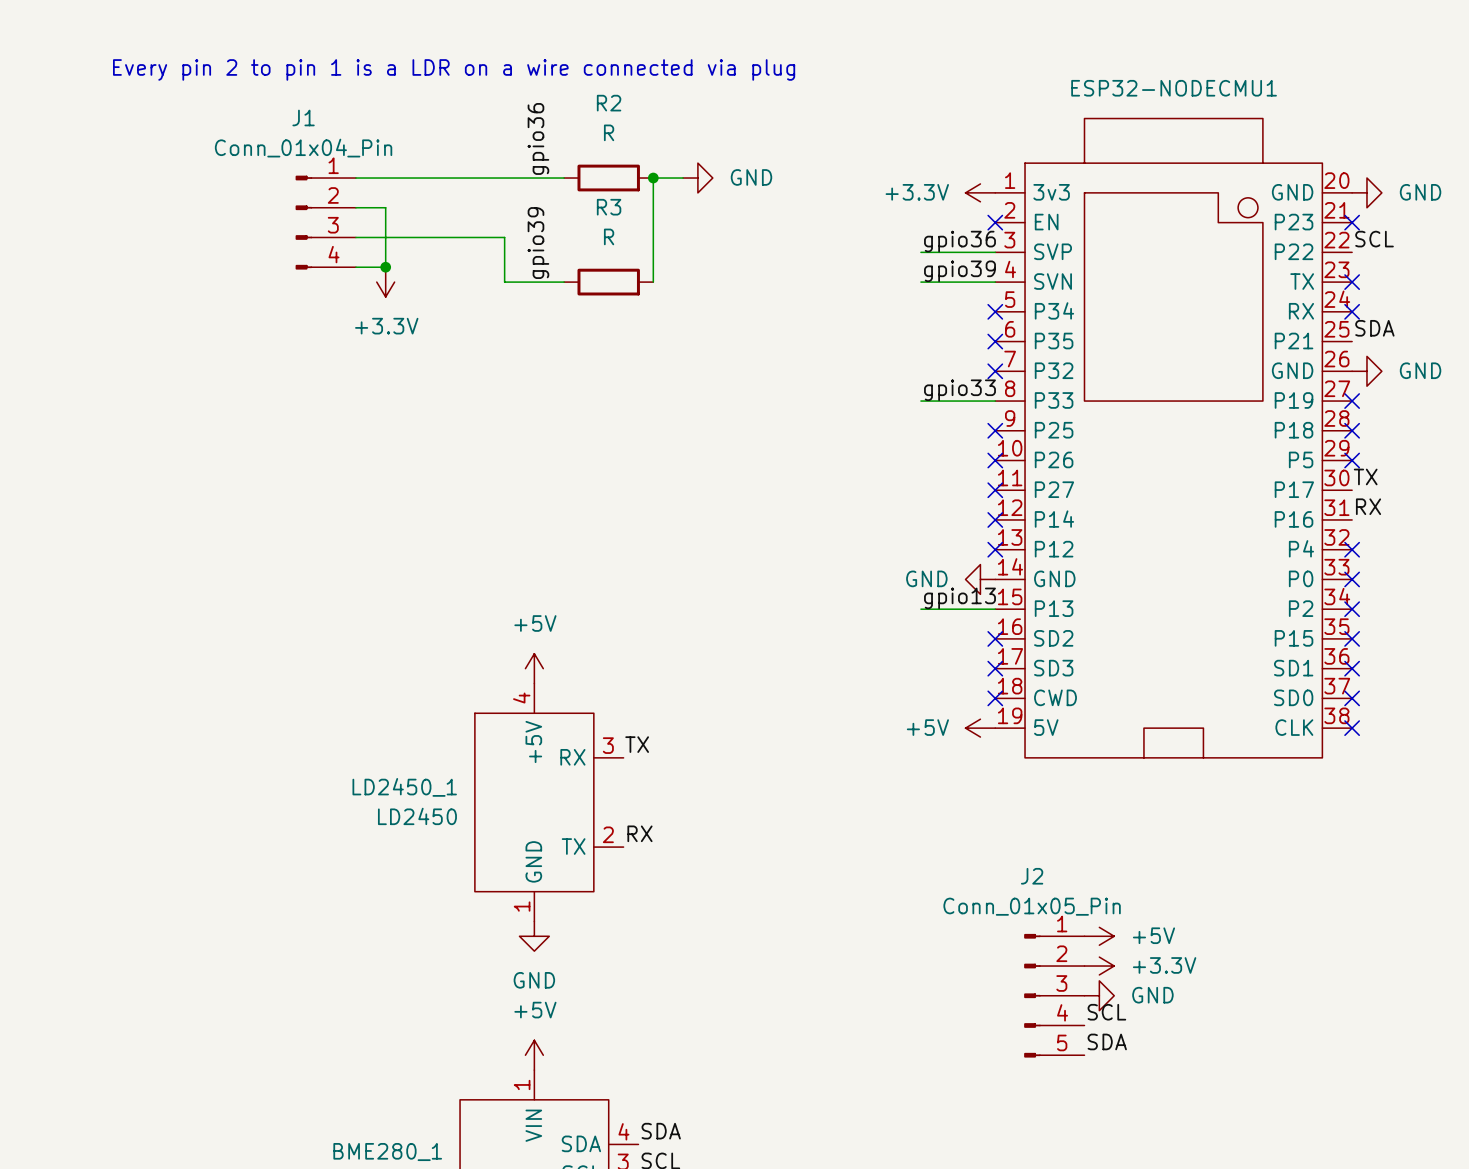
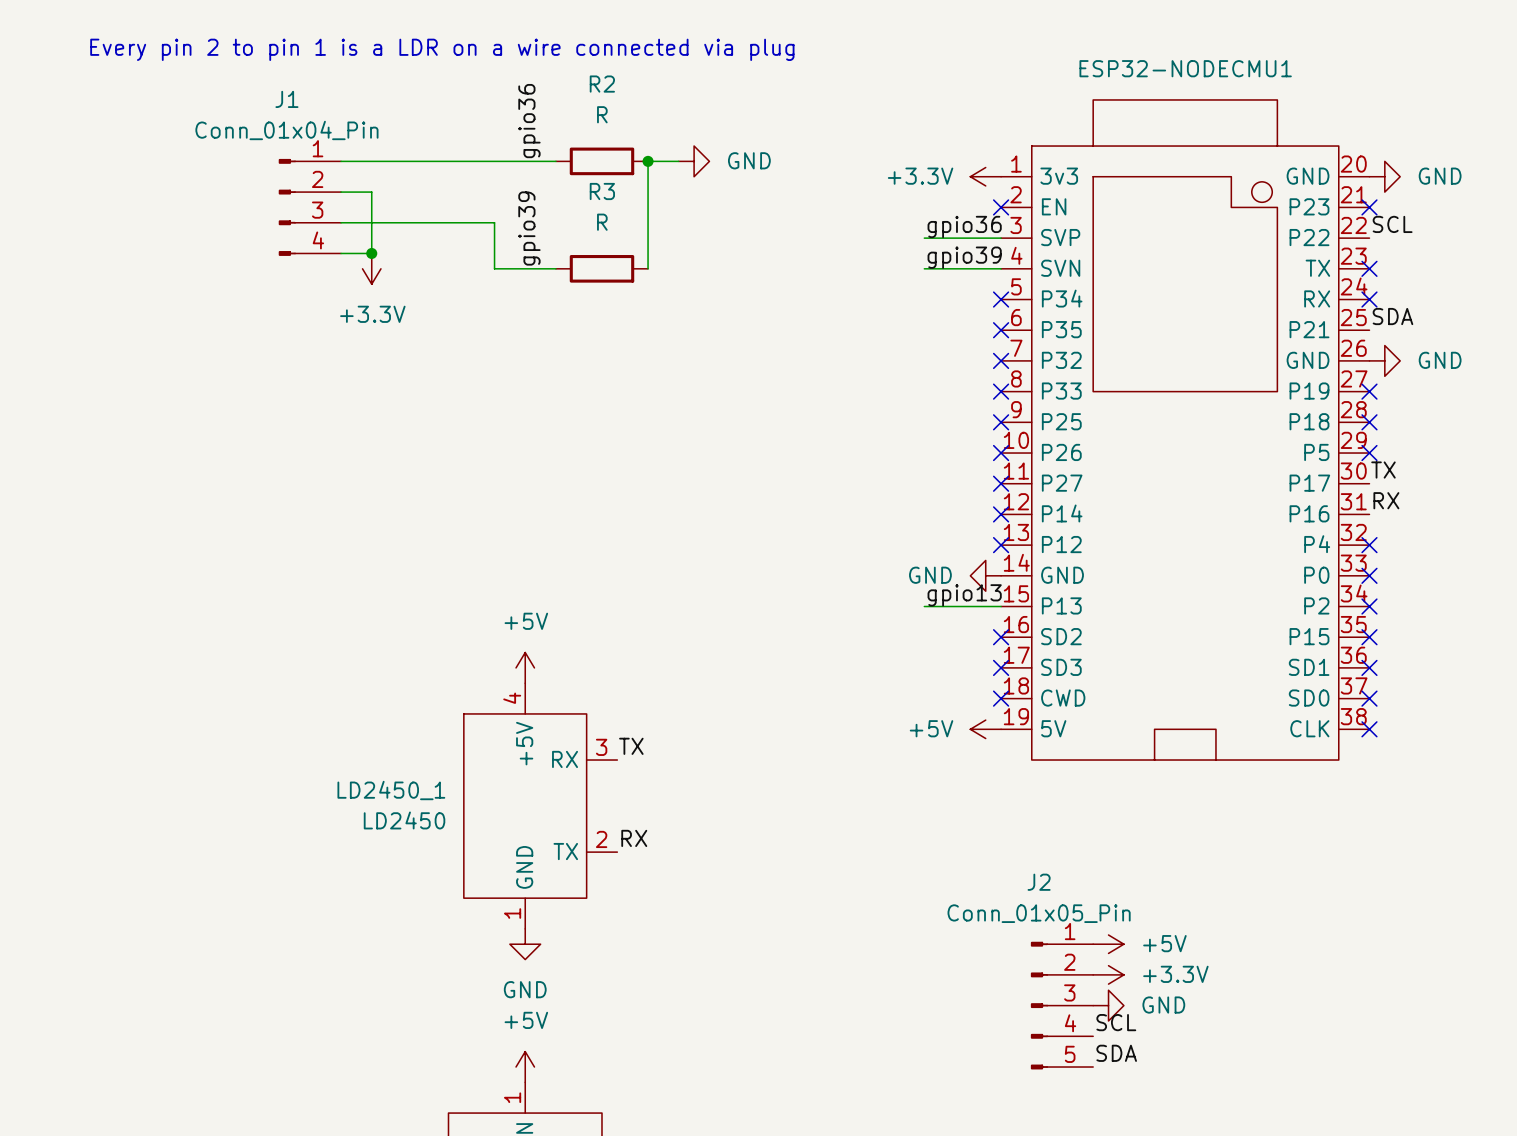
label: gpio33 (959, 390) -> none
wire: (920, 401) (995, 401) -> none
no-connect mark: none -> (1001, 391)

